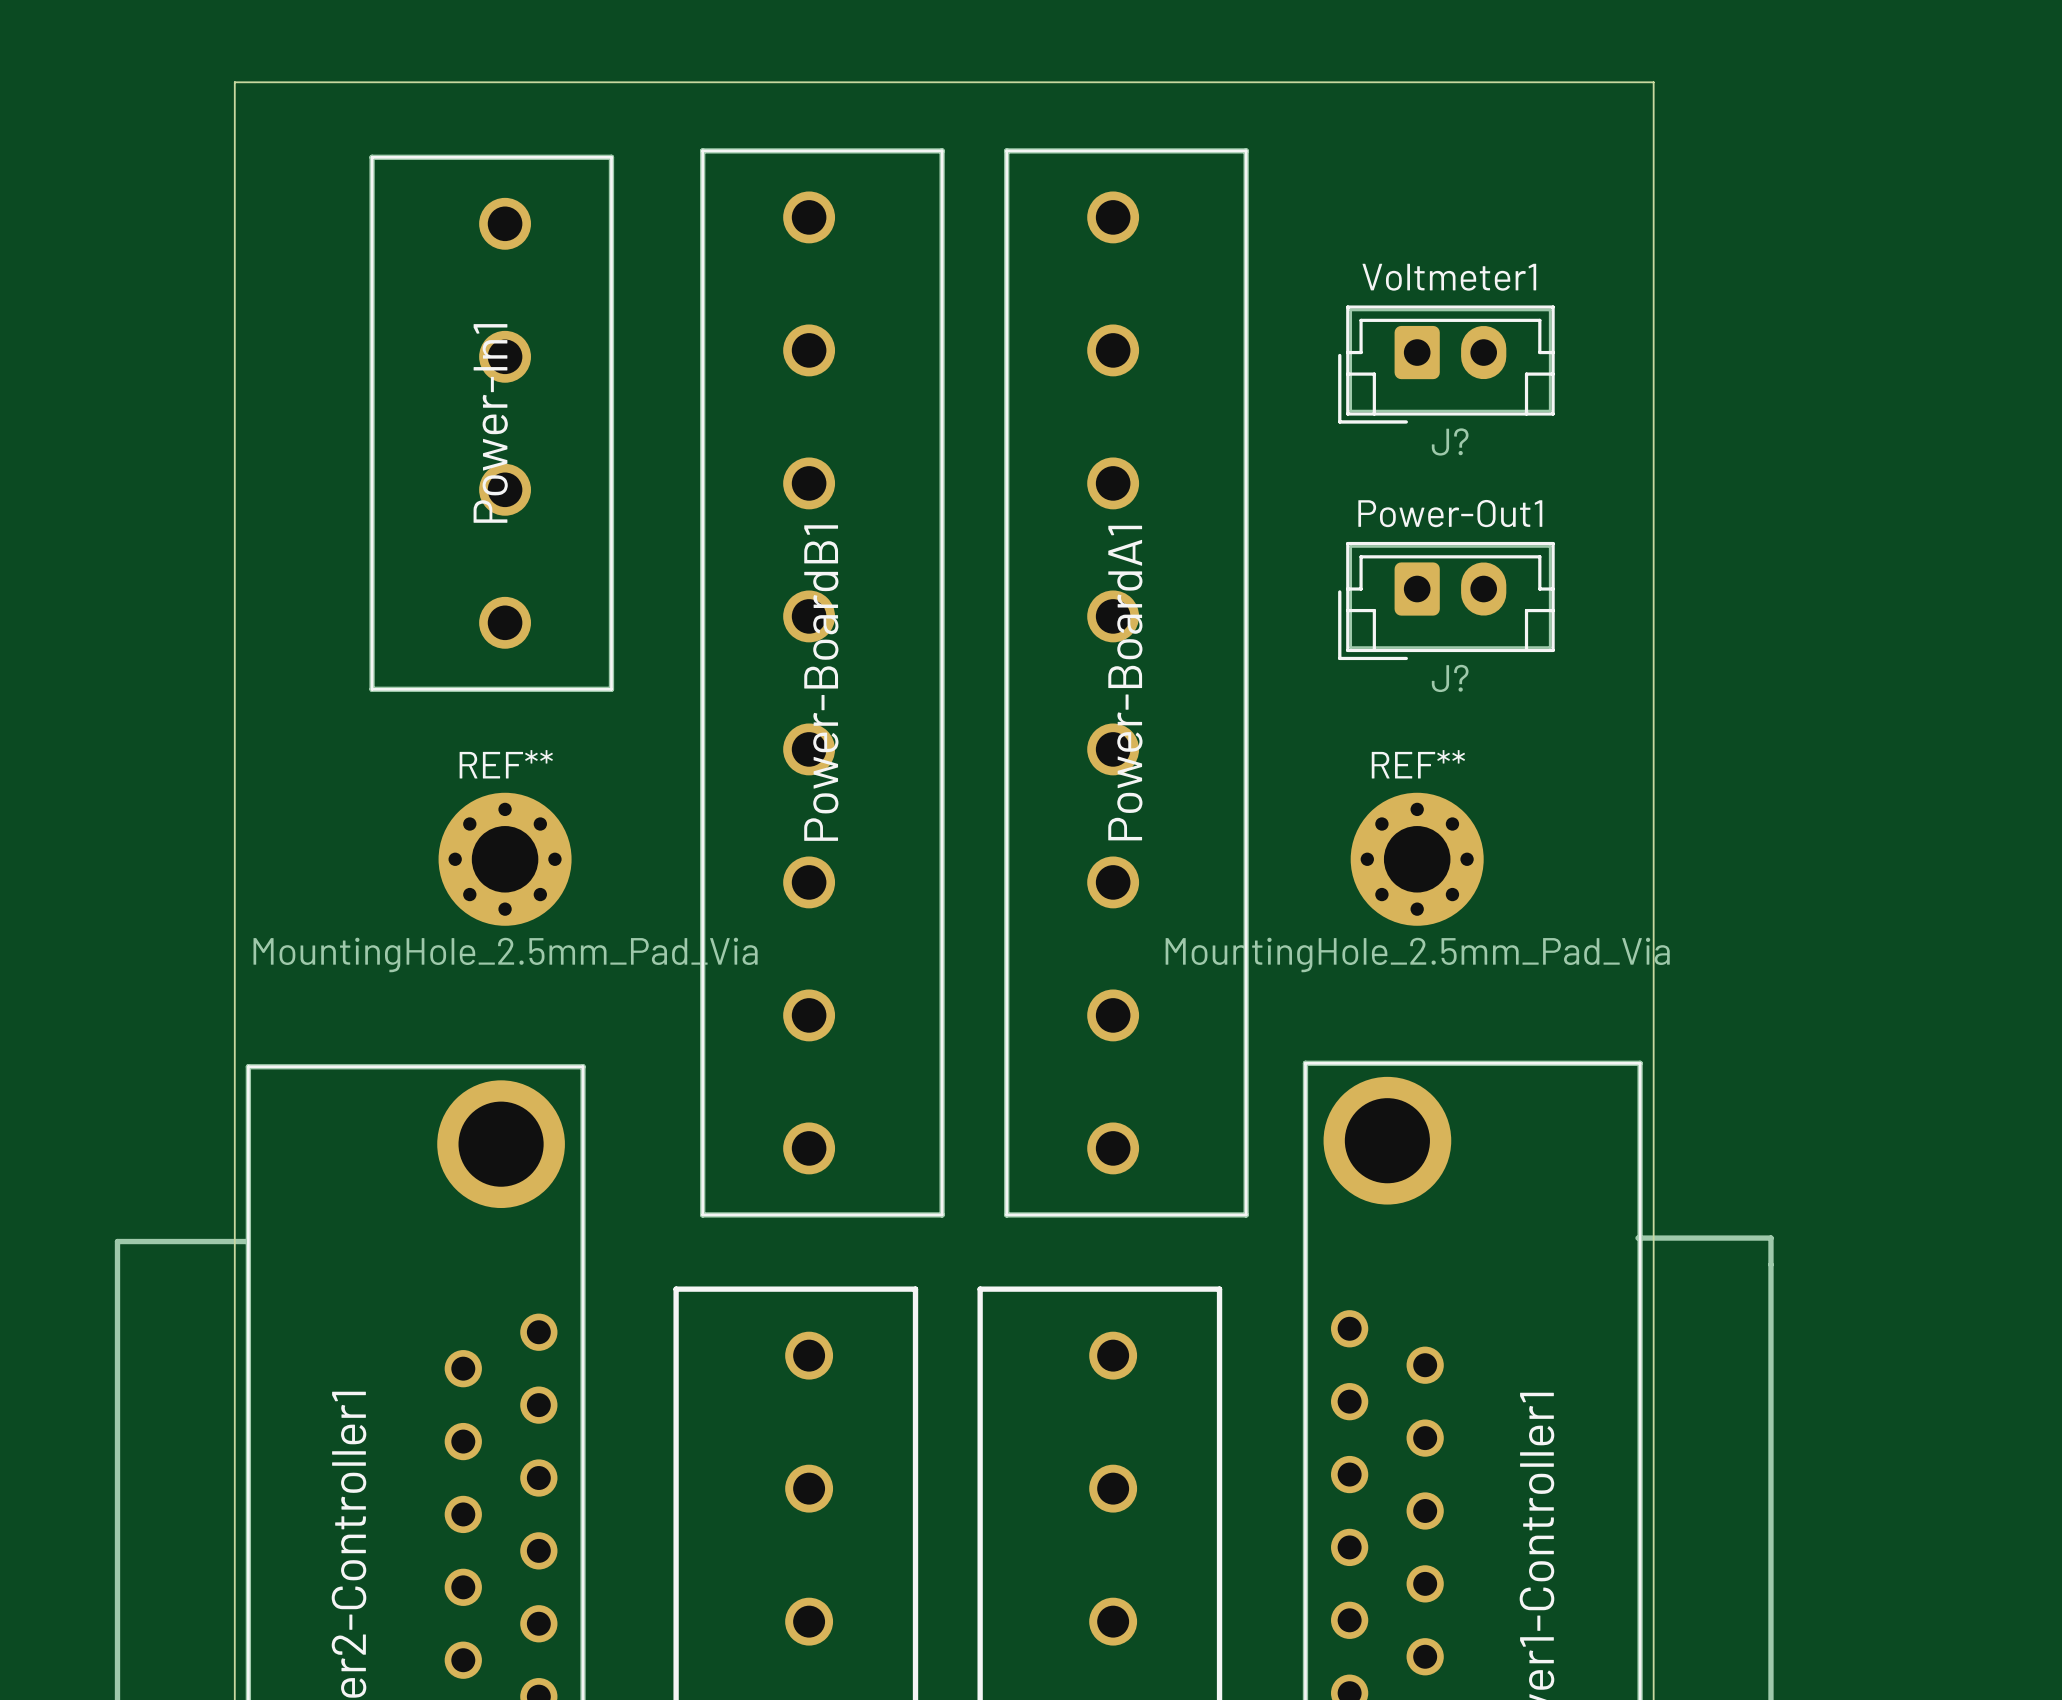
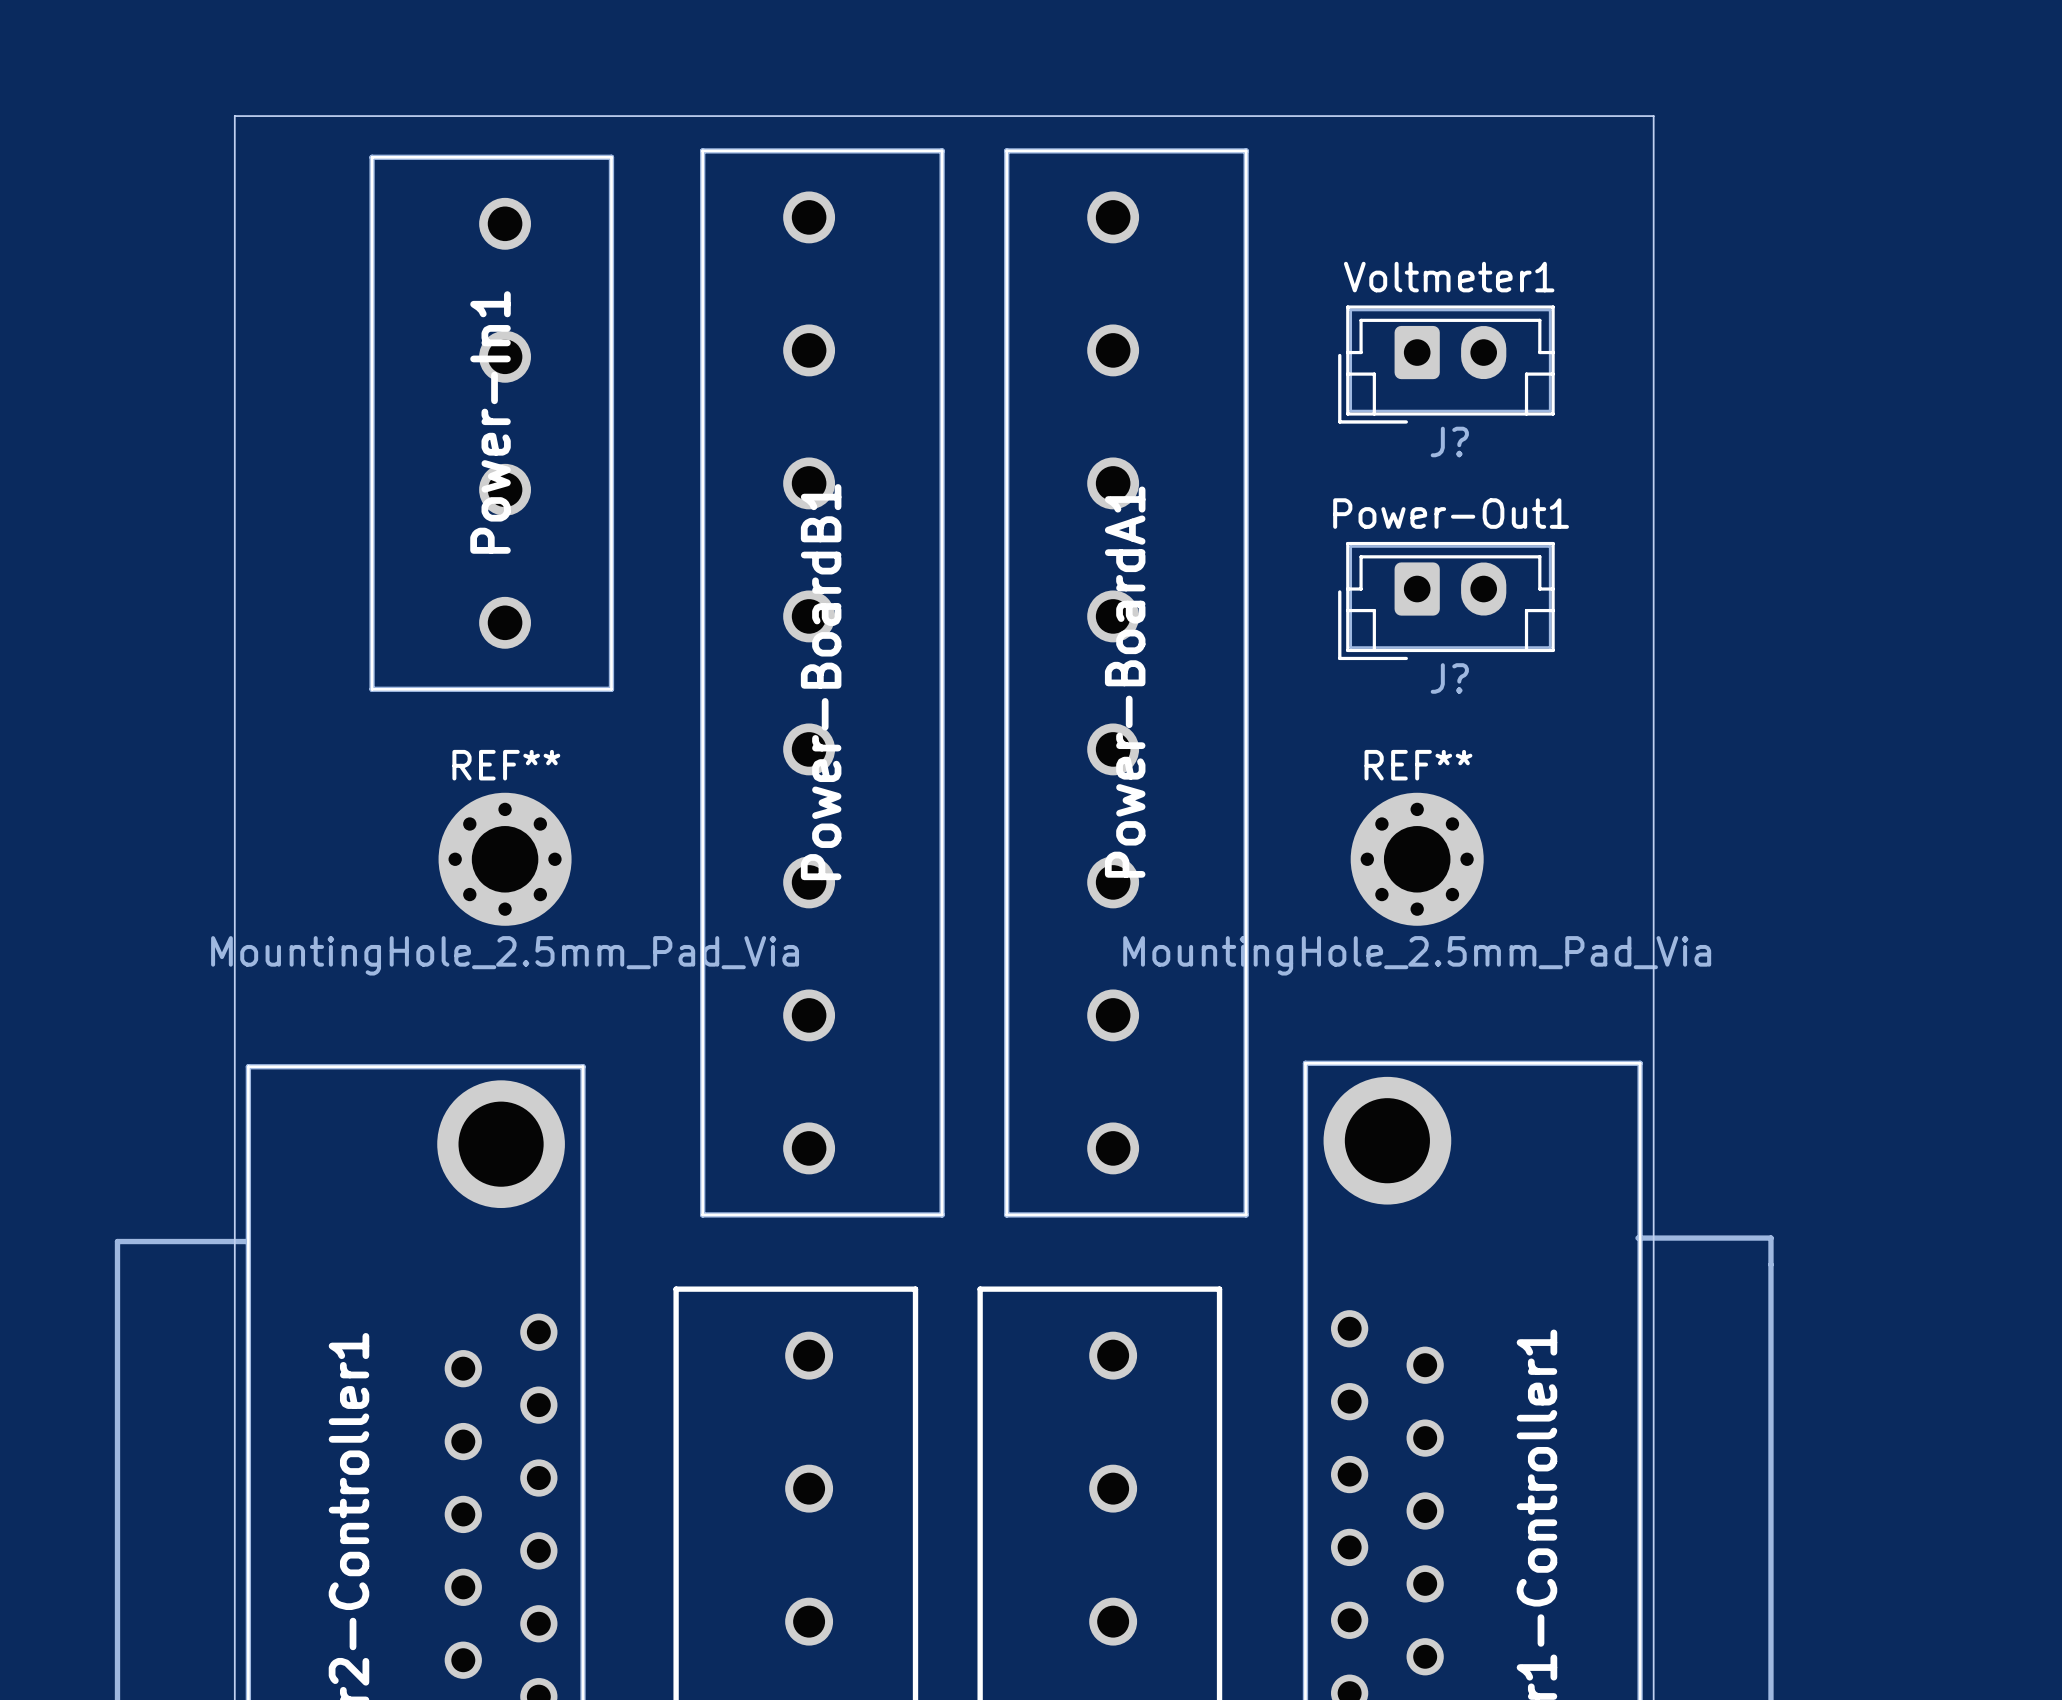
board edge: (234, 116) (234, 82) (1653, 82) (1653, 116) -> (234, 116) (1653, 116)

